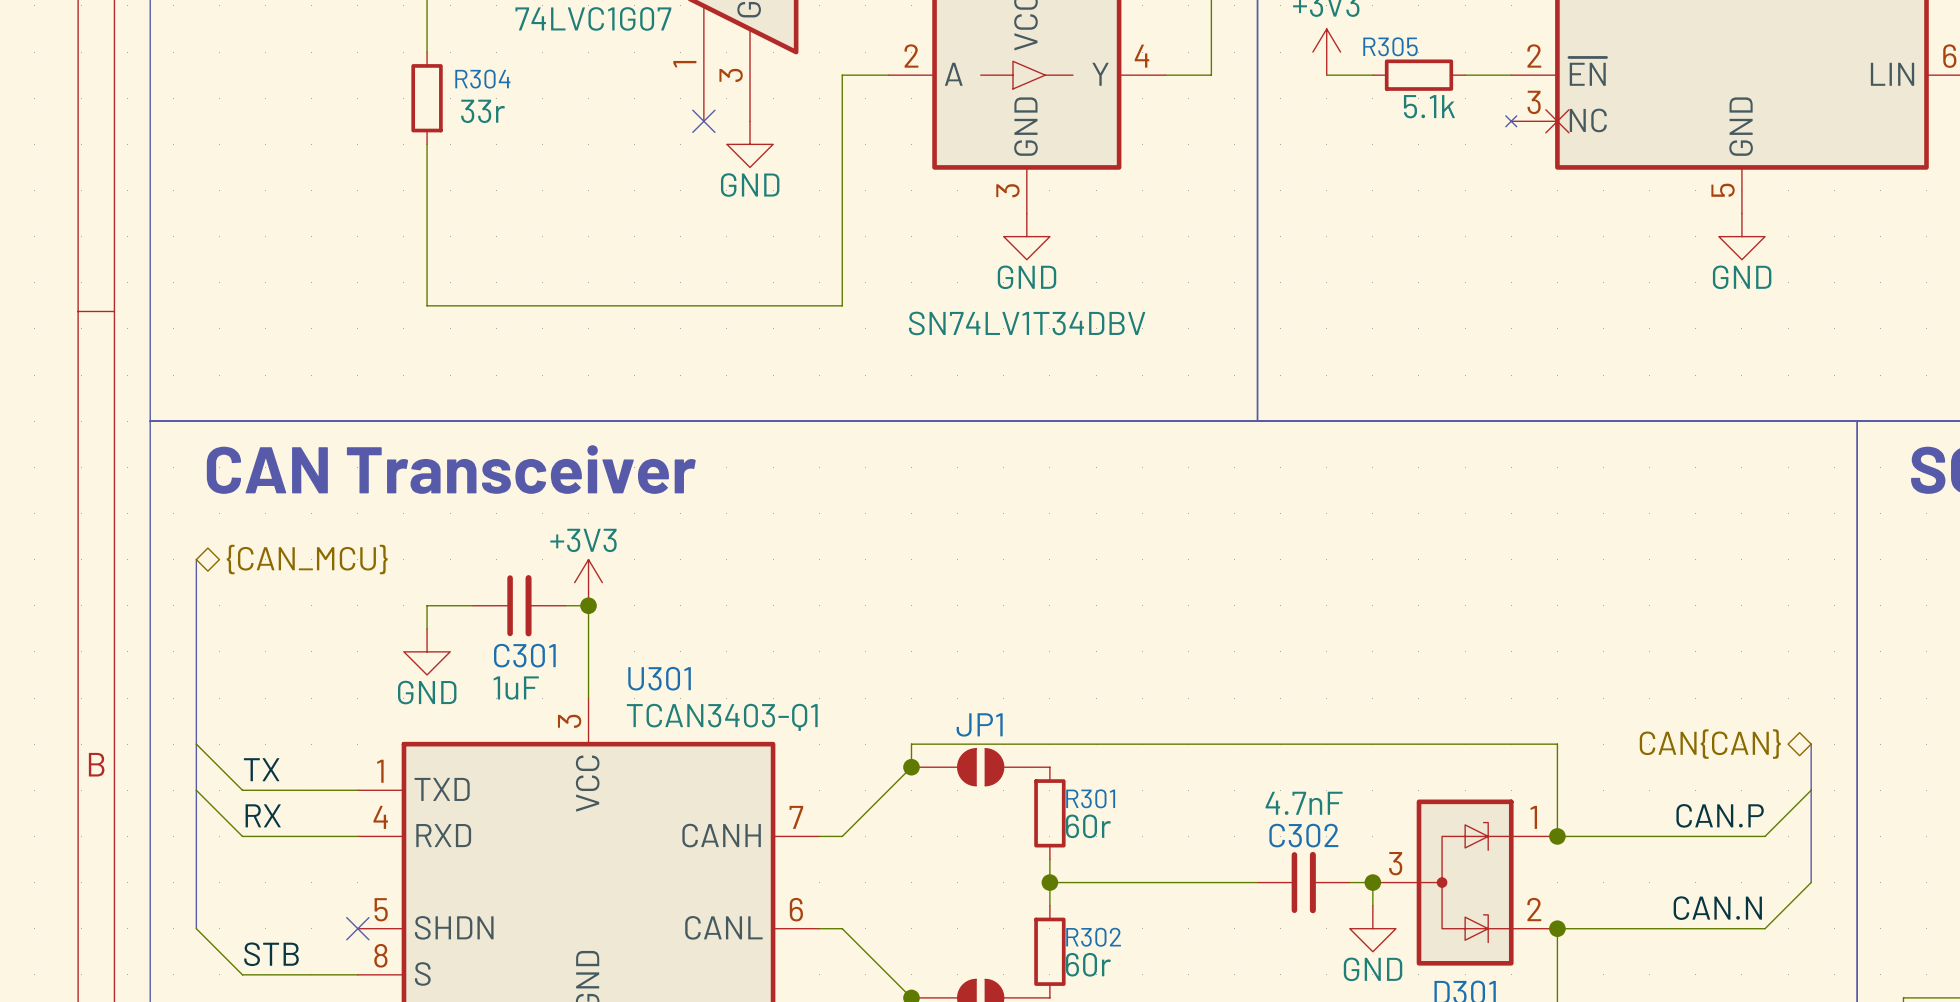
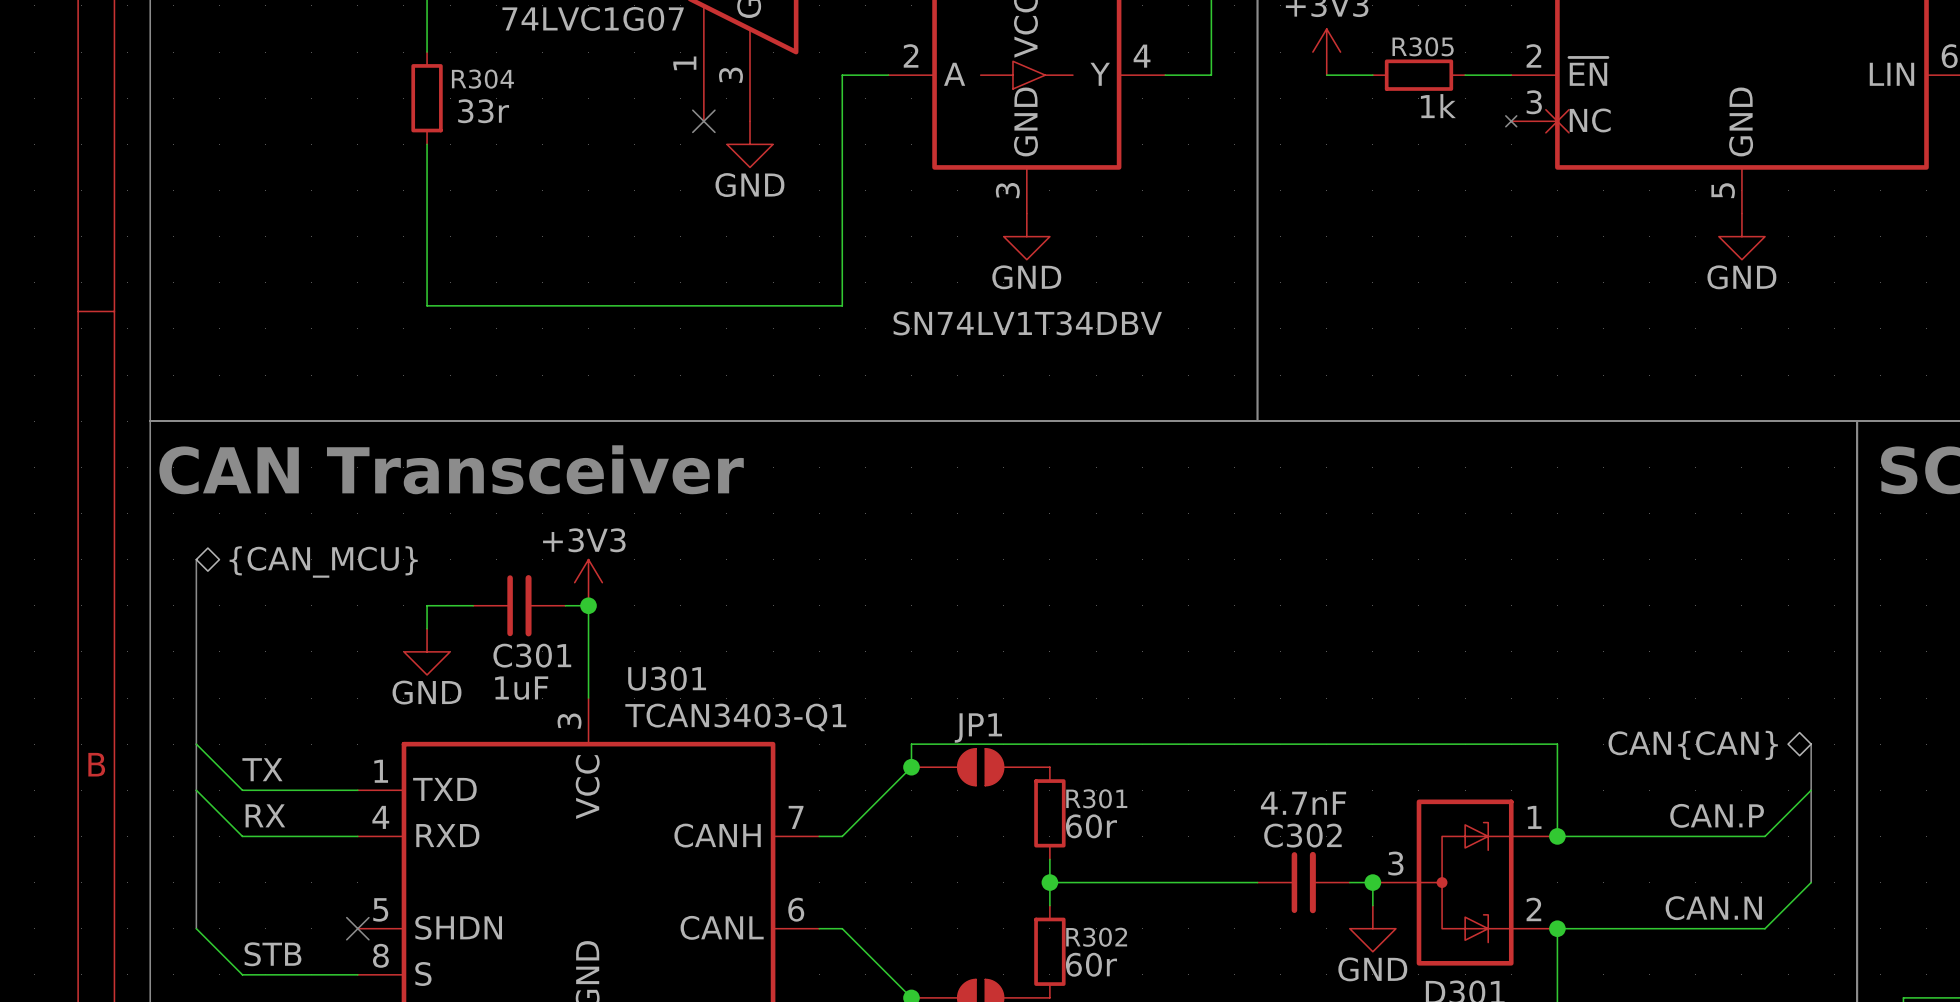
R305 name position: R305 (1390, 46) -> R305 (1423, 46)
R305 value: 5.1k (1429, 106) -> 1k (1438, 106)

